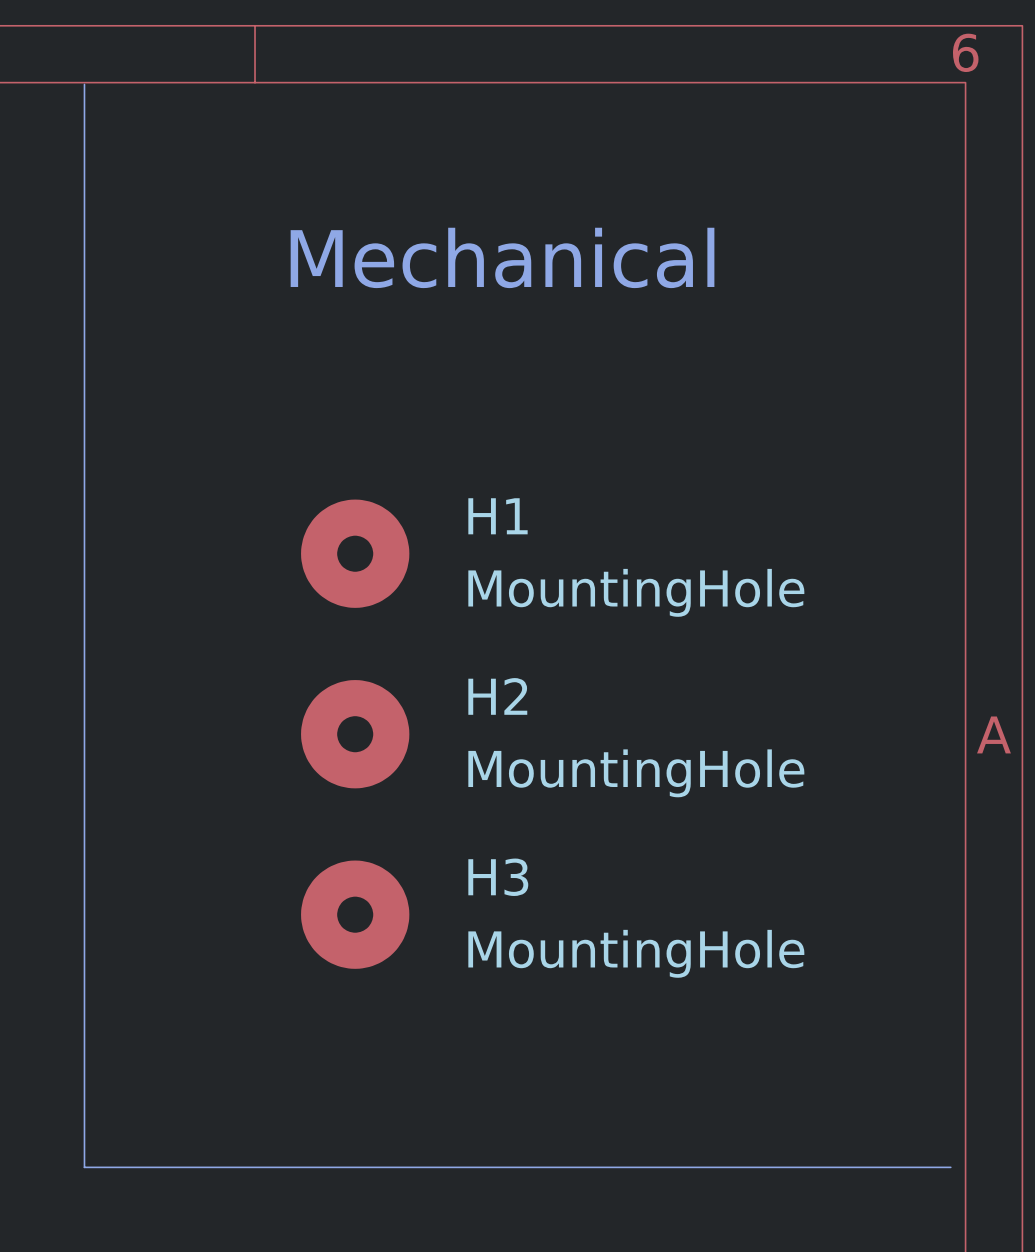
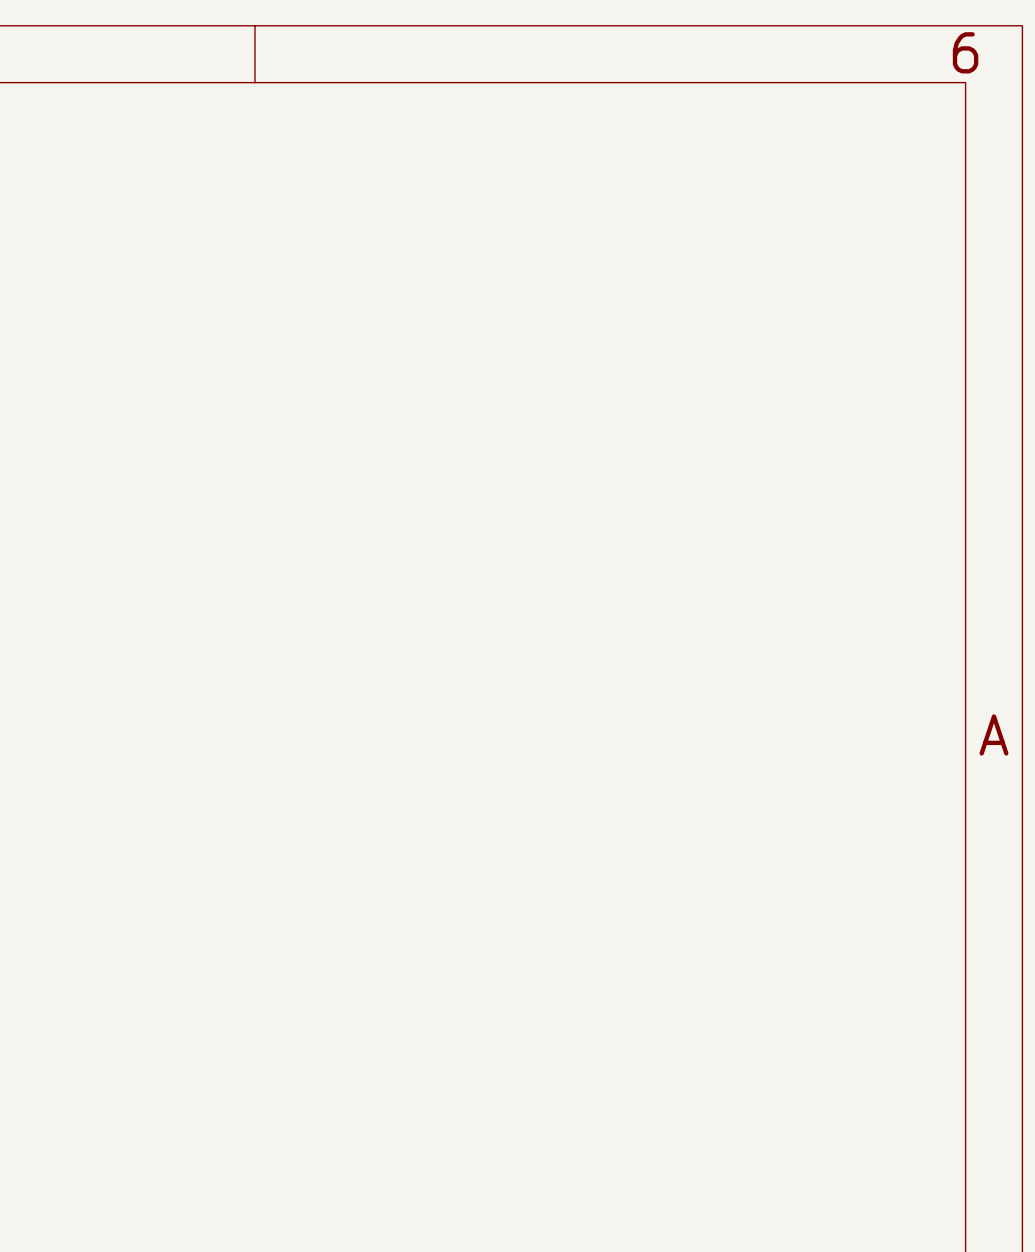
line: (84, 84) (84, 1167) (950, 1167) -> none
text: Mechanical (502, 257) -> none
H1: MountingHole (355, 553) -> none
H2: MountingHole (355, 734) -> none
H3: MountingHole (355, 914) -> none

